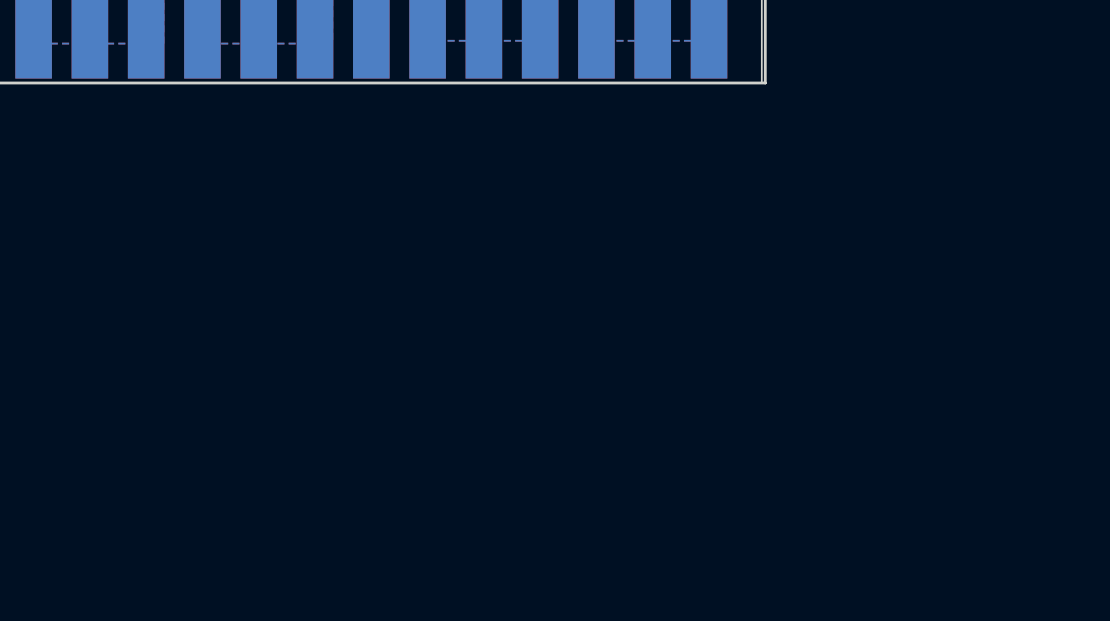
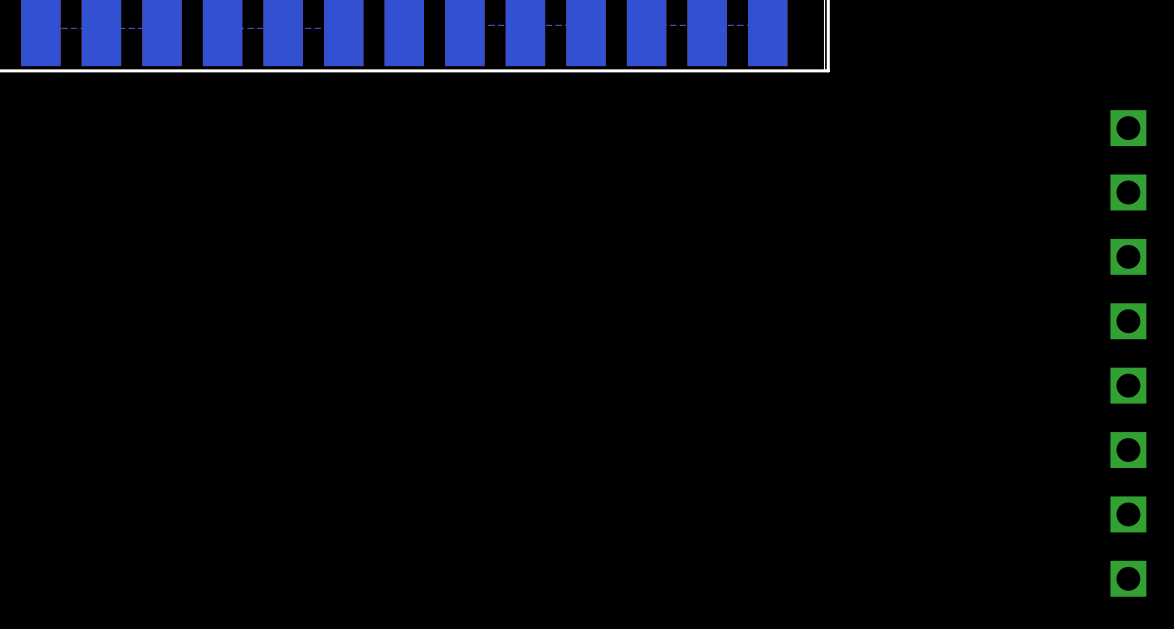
part: none -> (1128, 128)
part: none -> (1128, 192)
part: none -> (1128, 256)
part: none -> (1128, 321)
part: none -> (1128, 385)
part: none -> (1128, 450)
part: none -> (1128, 514)
part: none -> (1128, 578)

